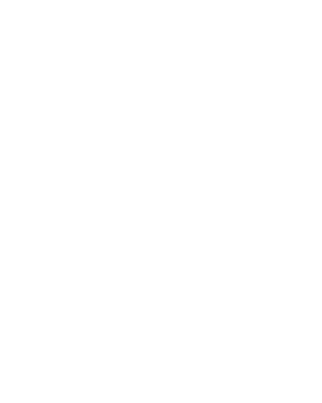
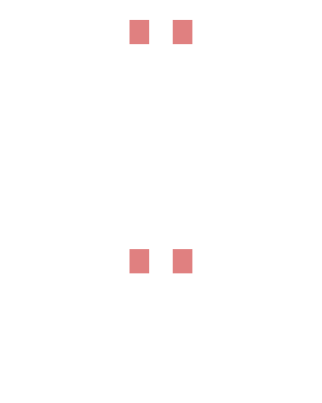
part: none -> (160, 32)
part: none -> (160, 261)

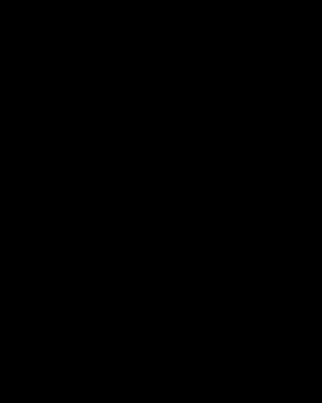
part: (160, 32) -> none
part: (160, 261) -> none

